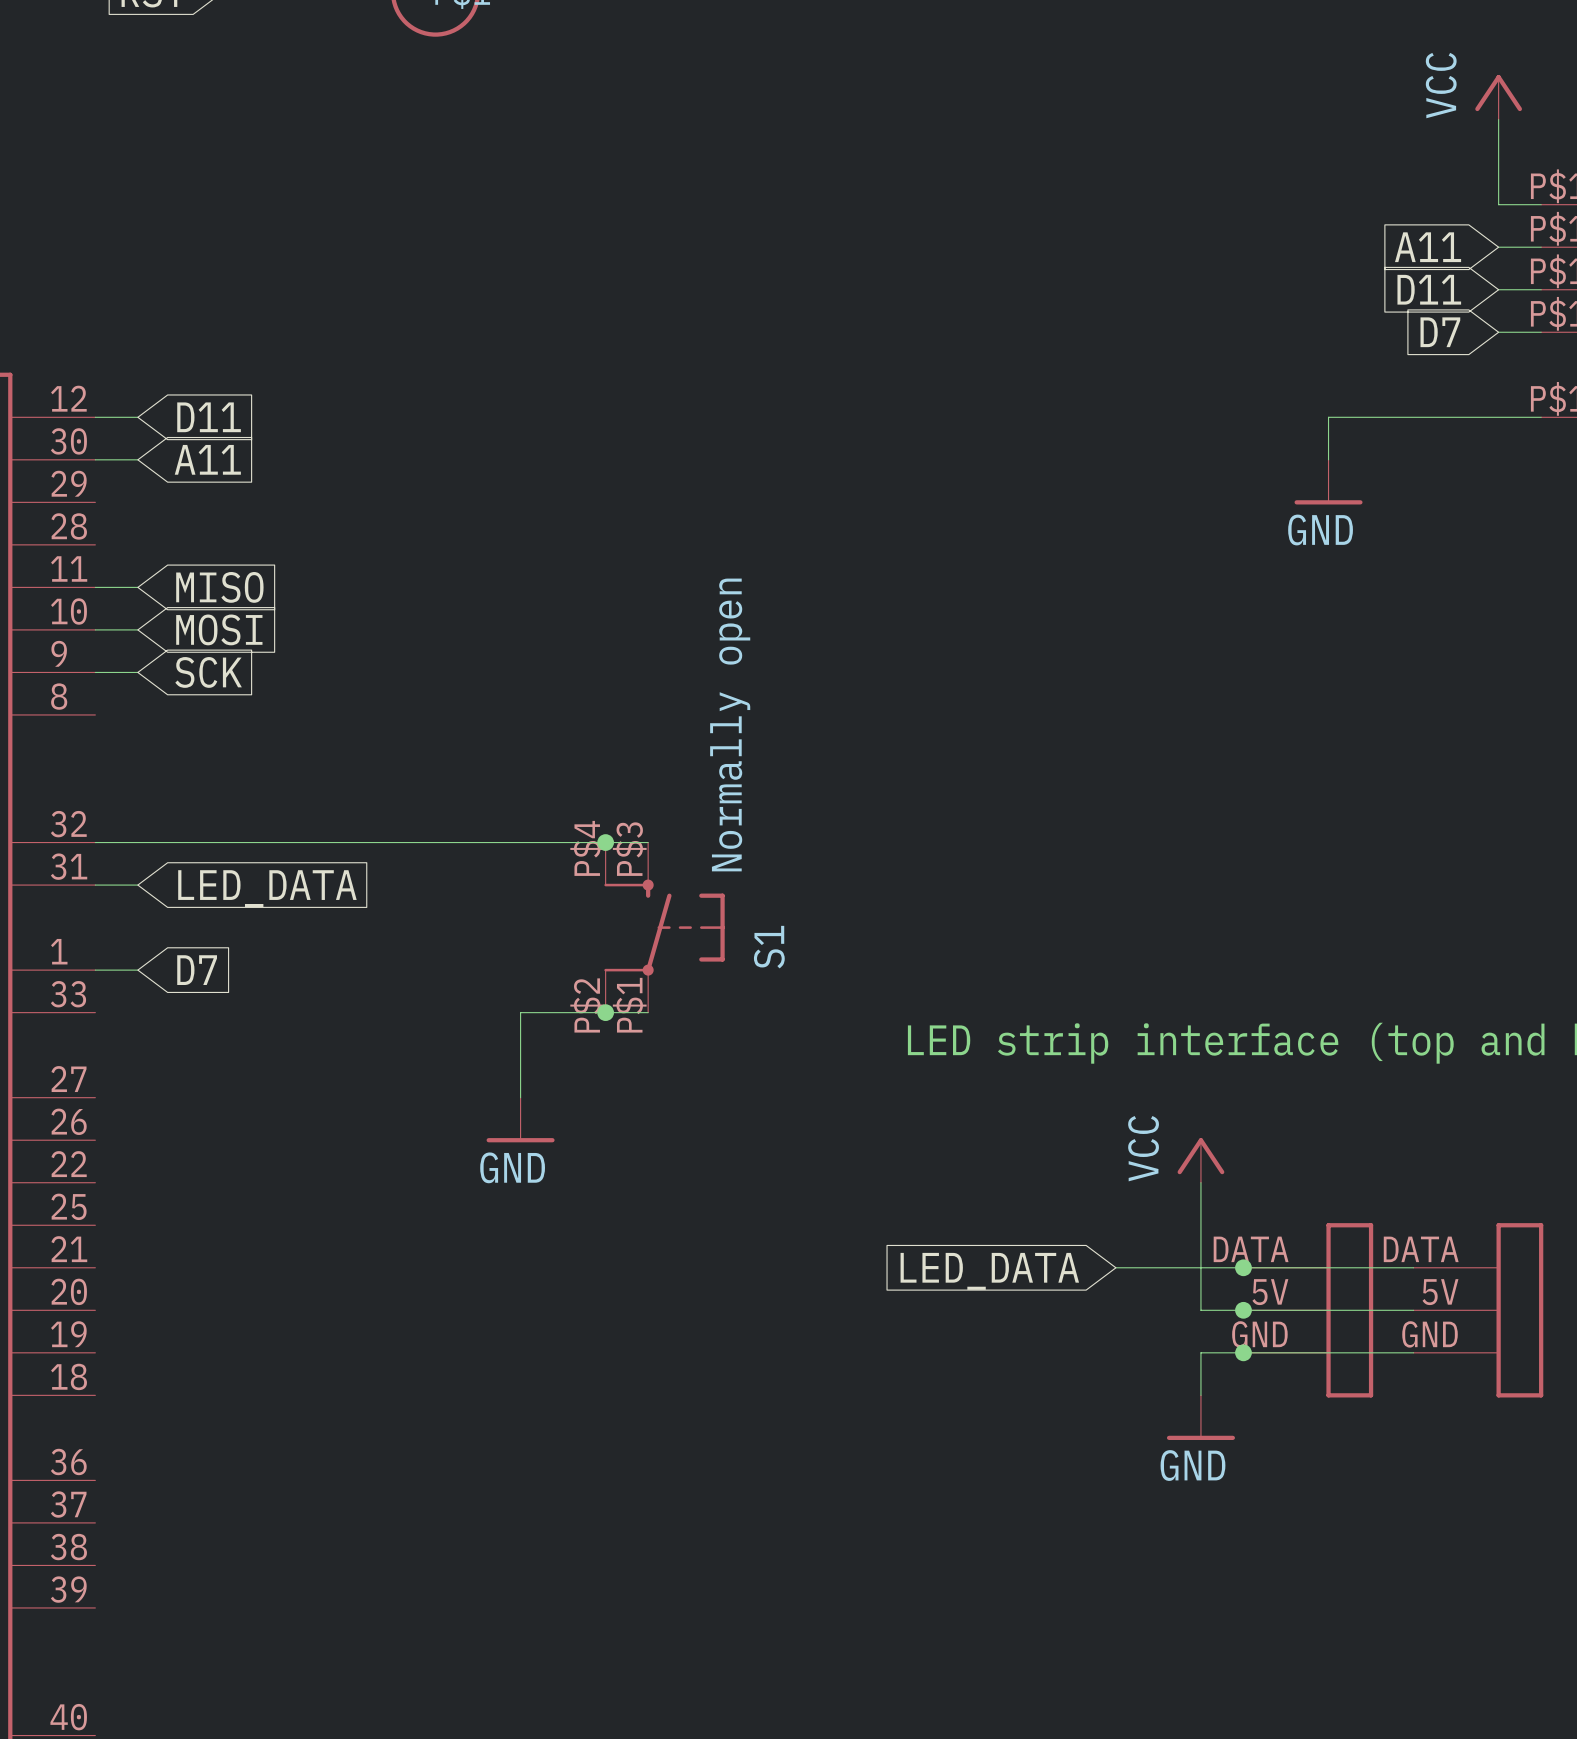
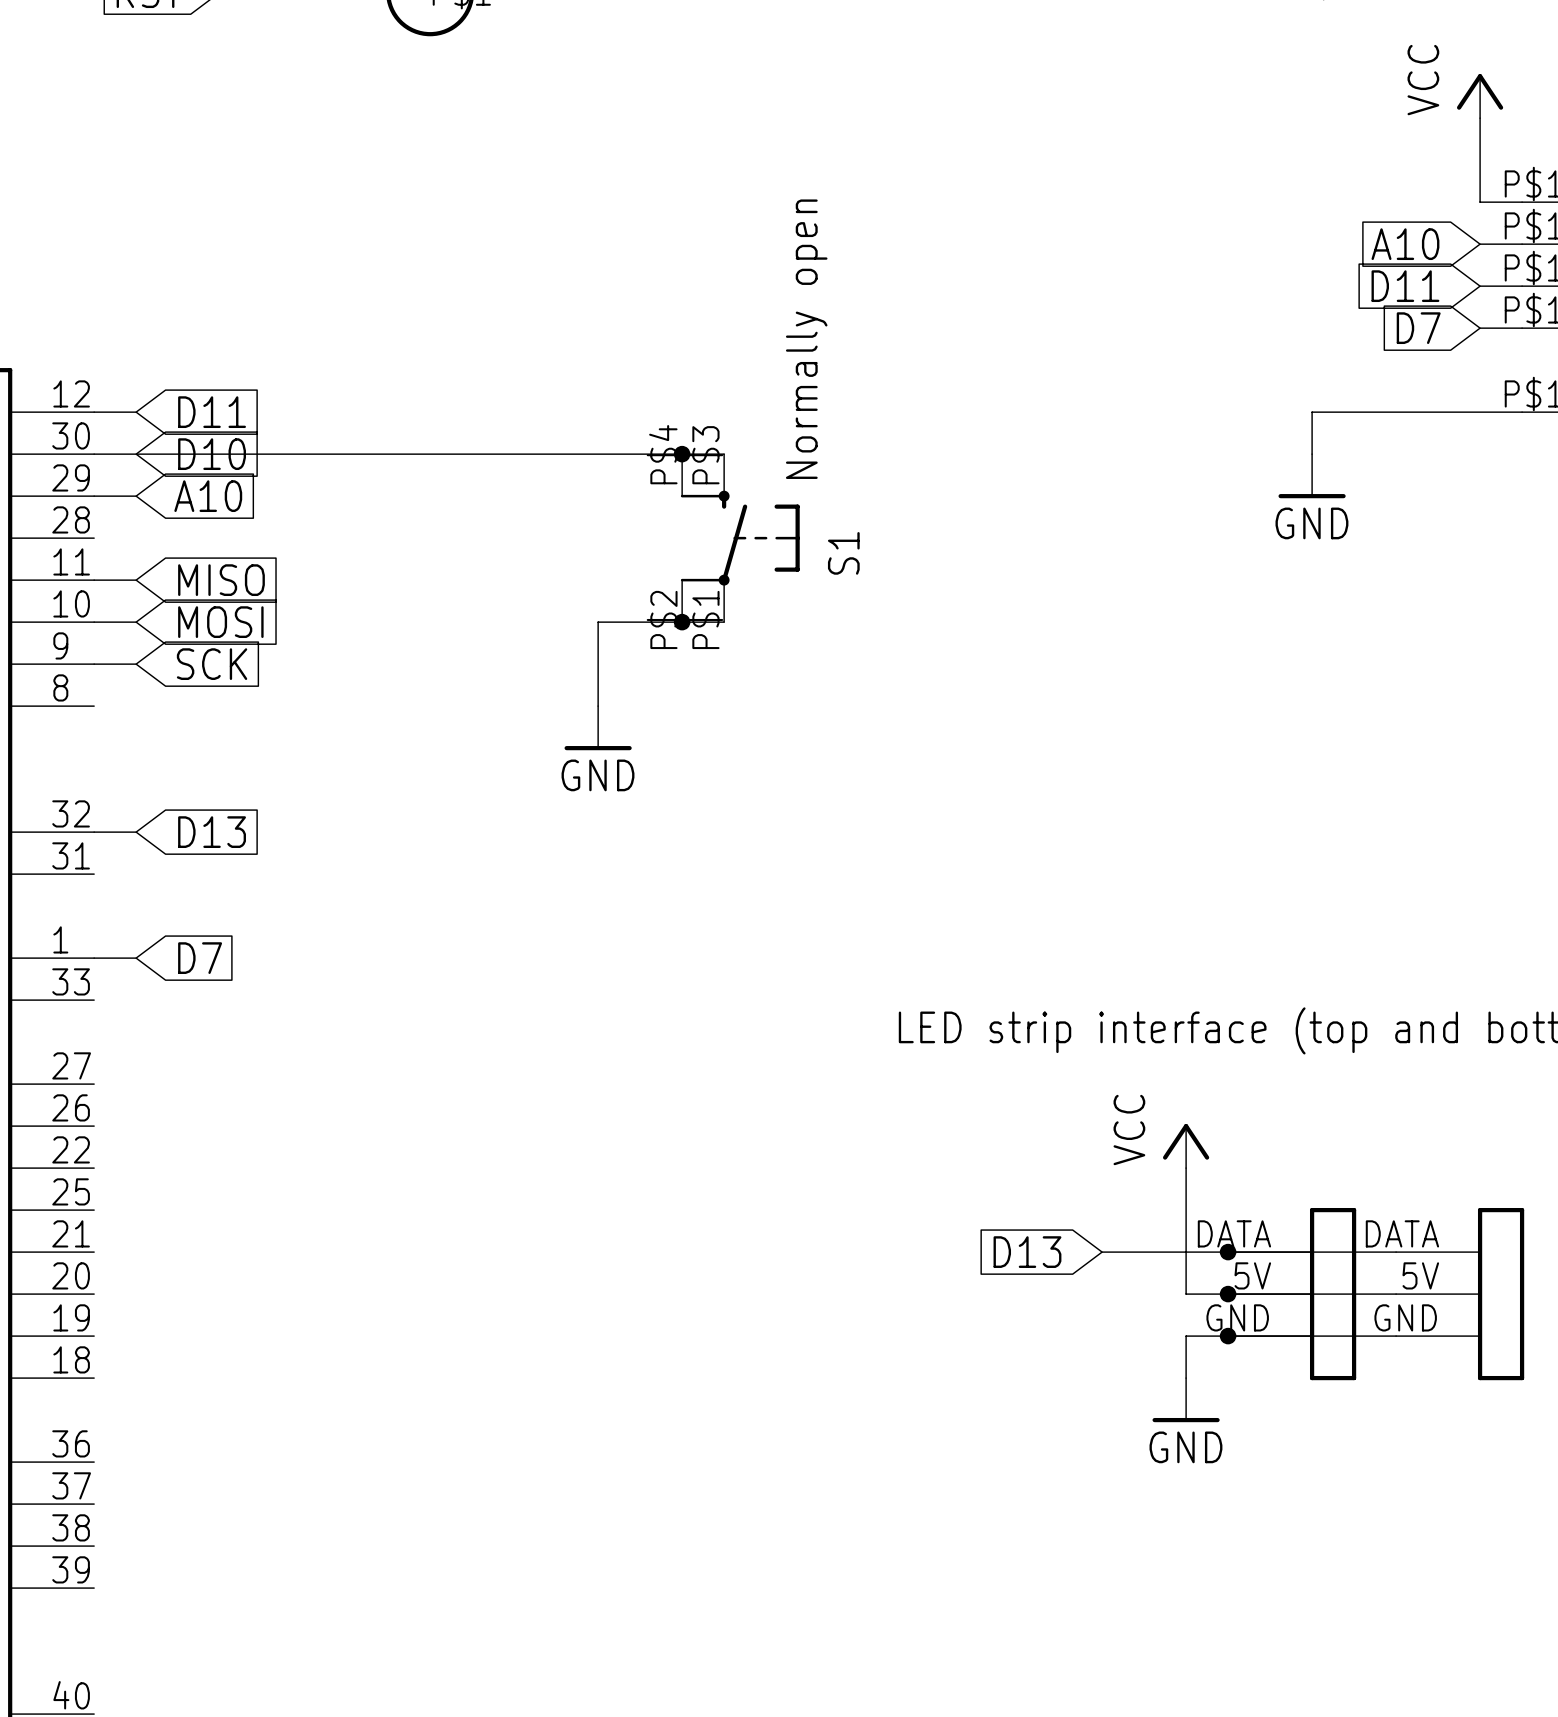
global label: A11 (1428, 247) -> A10 (1405, 244)
wire: none -> (136, 454) (724, 454)
global label: A11 (207, 459) -> D10 (212, 454)
junction: none -> (682, 454)
global label: none -> A10 (208, 496)
junction: none -> (682, 622)
wire: (137, 842) (648, 842) -> none
global label: none -> D13 (212, 832)
junction: (605, 842) -> none
wire: (95, 885) (137, 885) -> (94, 496) (136, 496)
global label: LED_DATA (267, 888) -> none
S1 position: (664, 927) -> (740, 538)
junction: (605, 1012) -> none
wire: (648, 1012) (520, 1012) (520, 1097) -> (724, 622) (598, 622) (598, 706)
power symbol position: GND (520, 1120) -> GND (598, 728)
global label: LED_DATA (989, 1271) -> D13 (1027, 1252)

